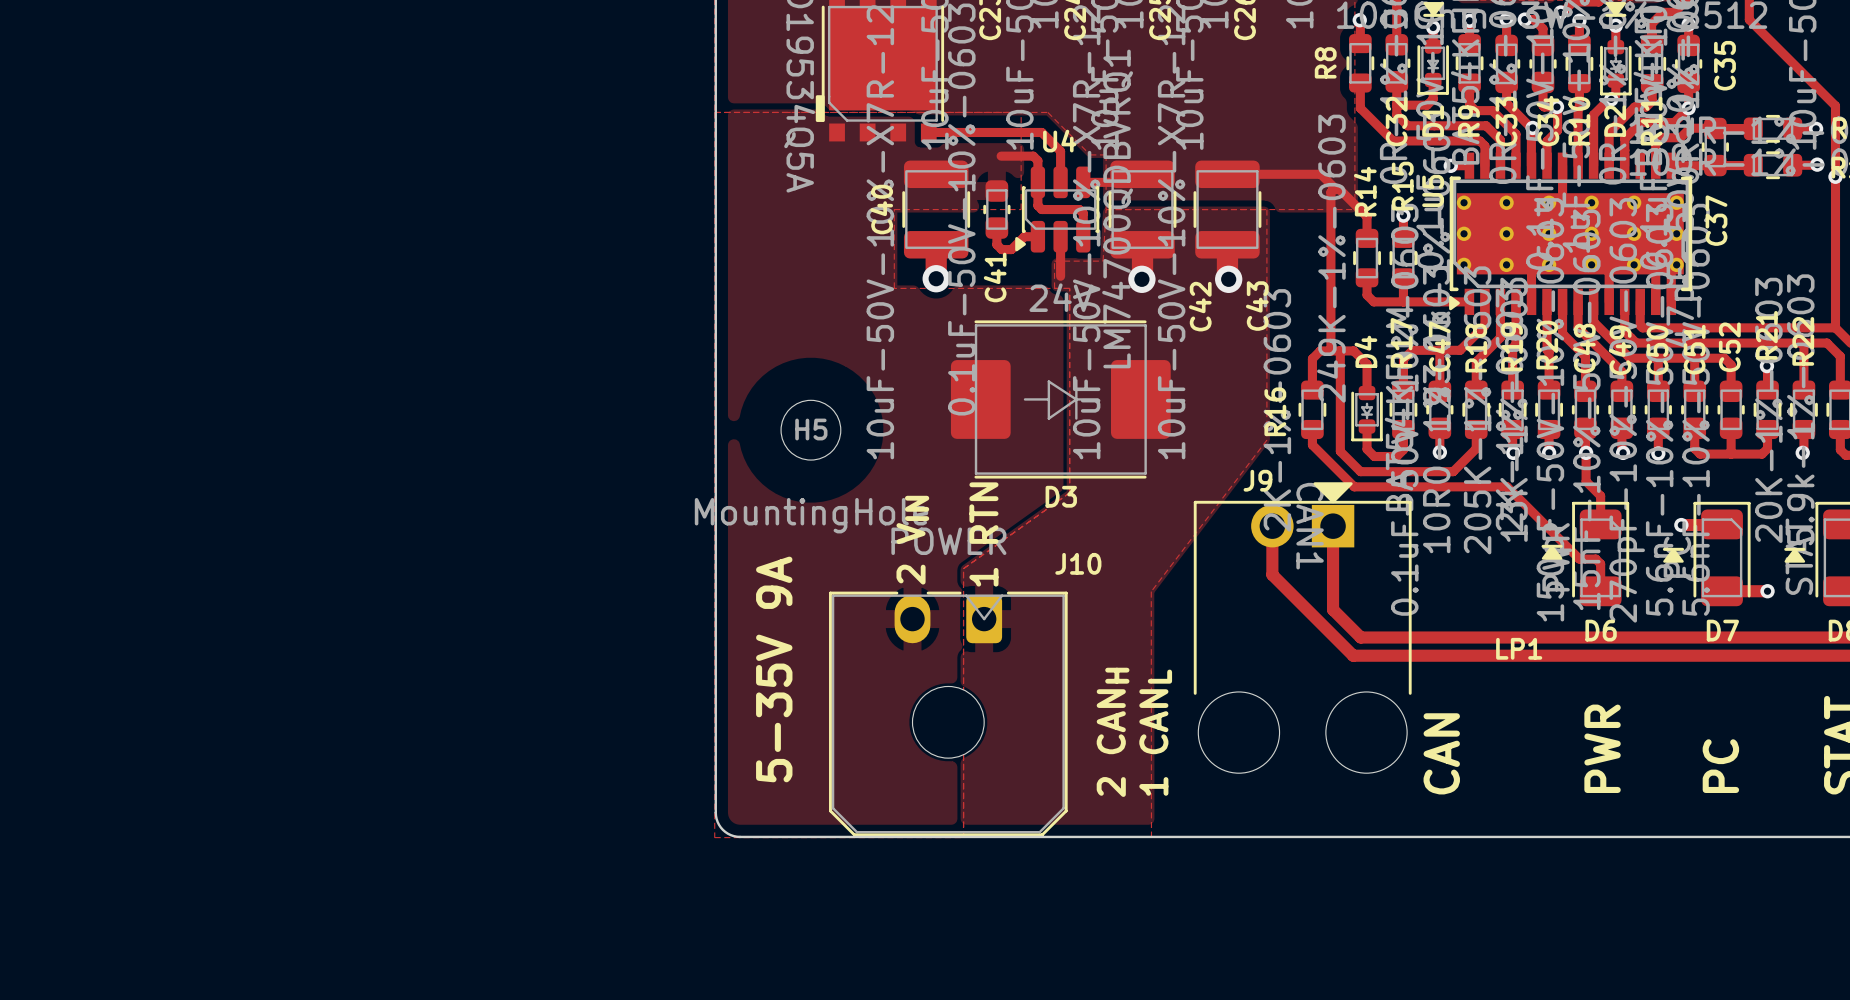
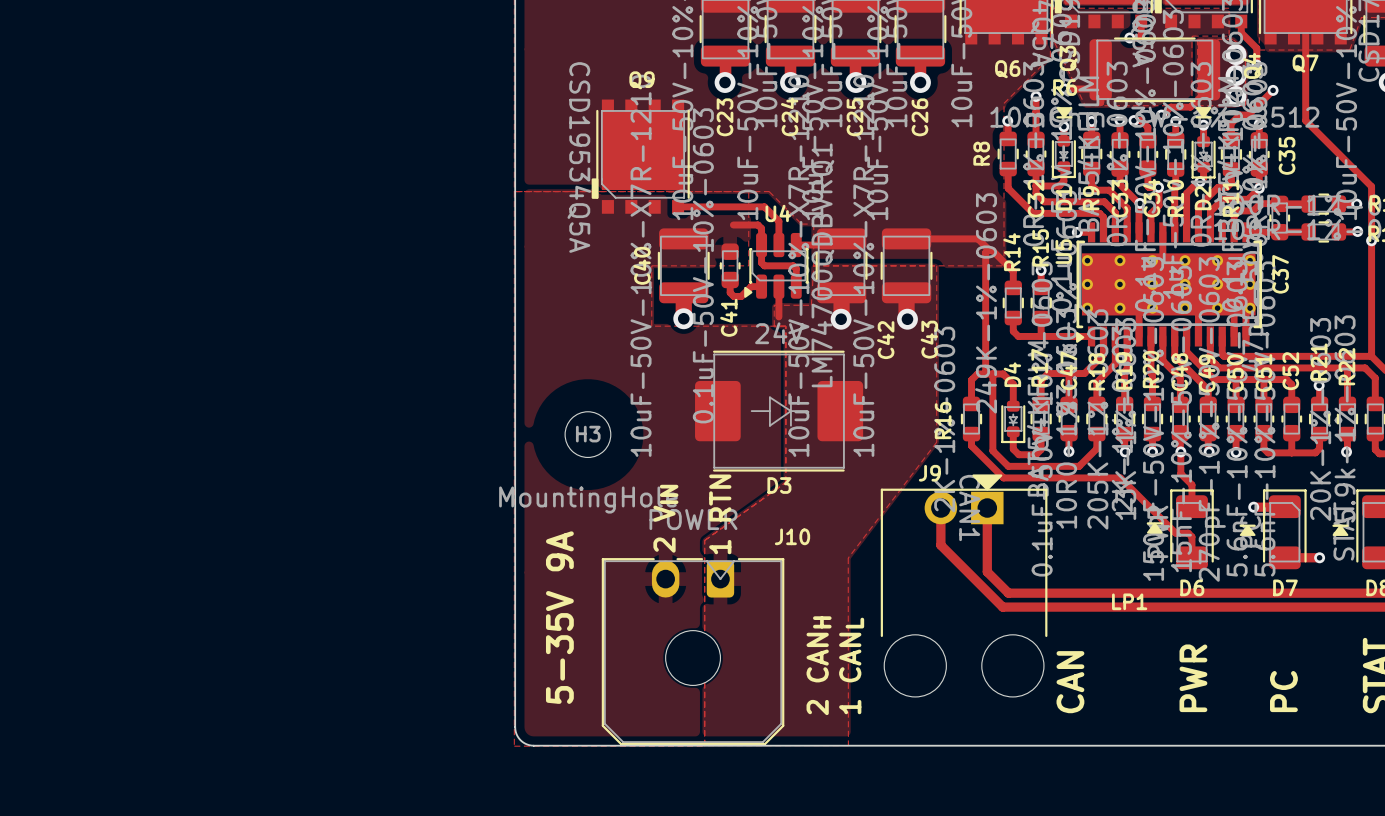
H5 name: H5 (811, 429) -> H3 (588, 434)

